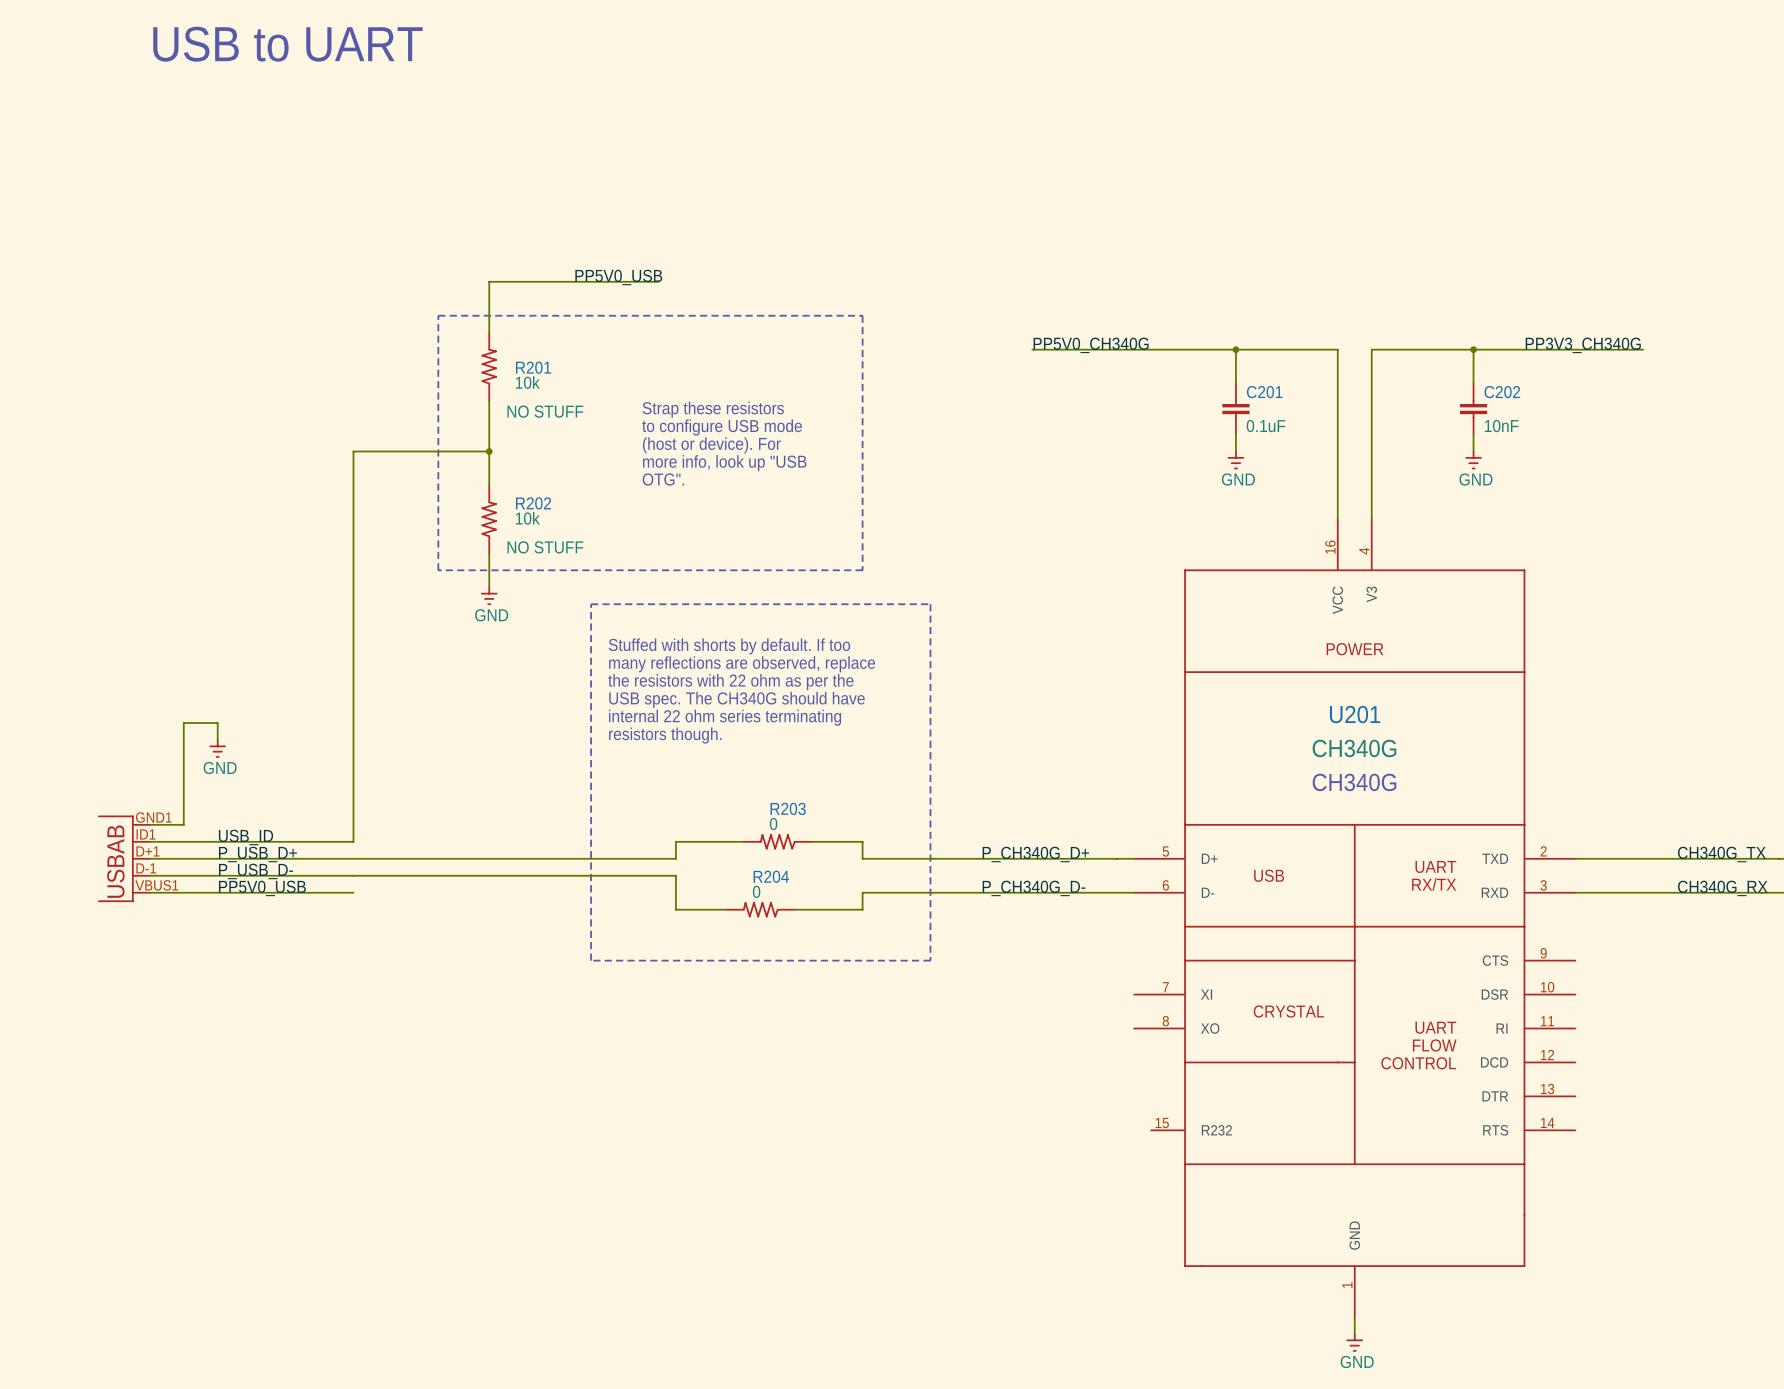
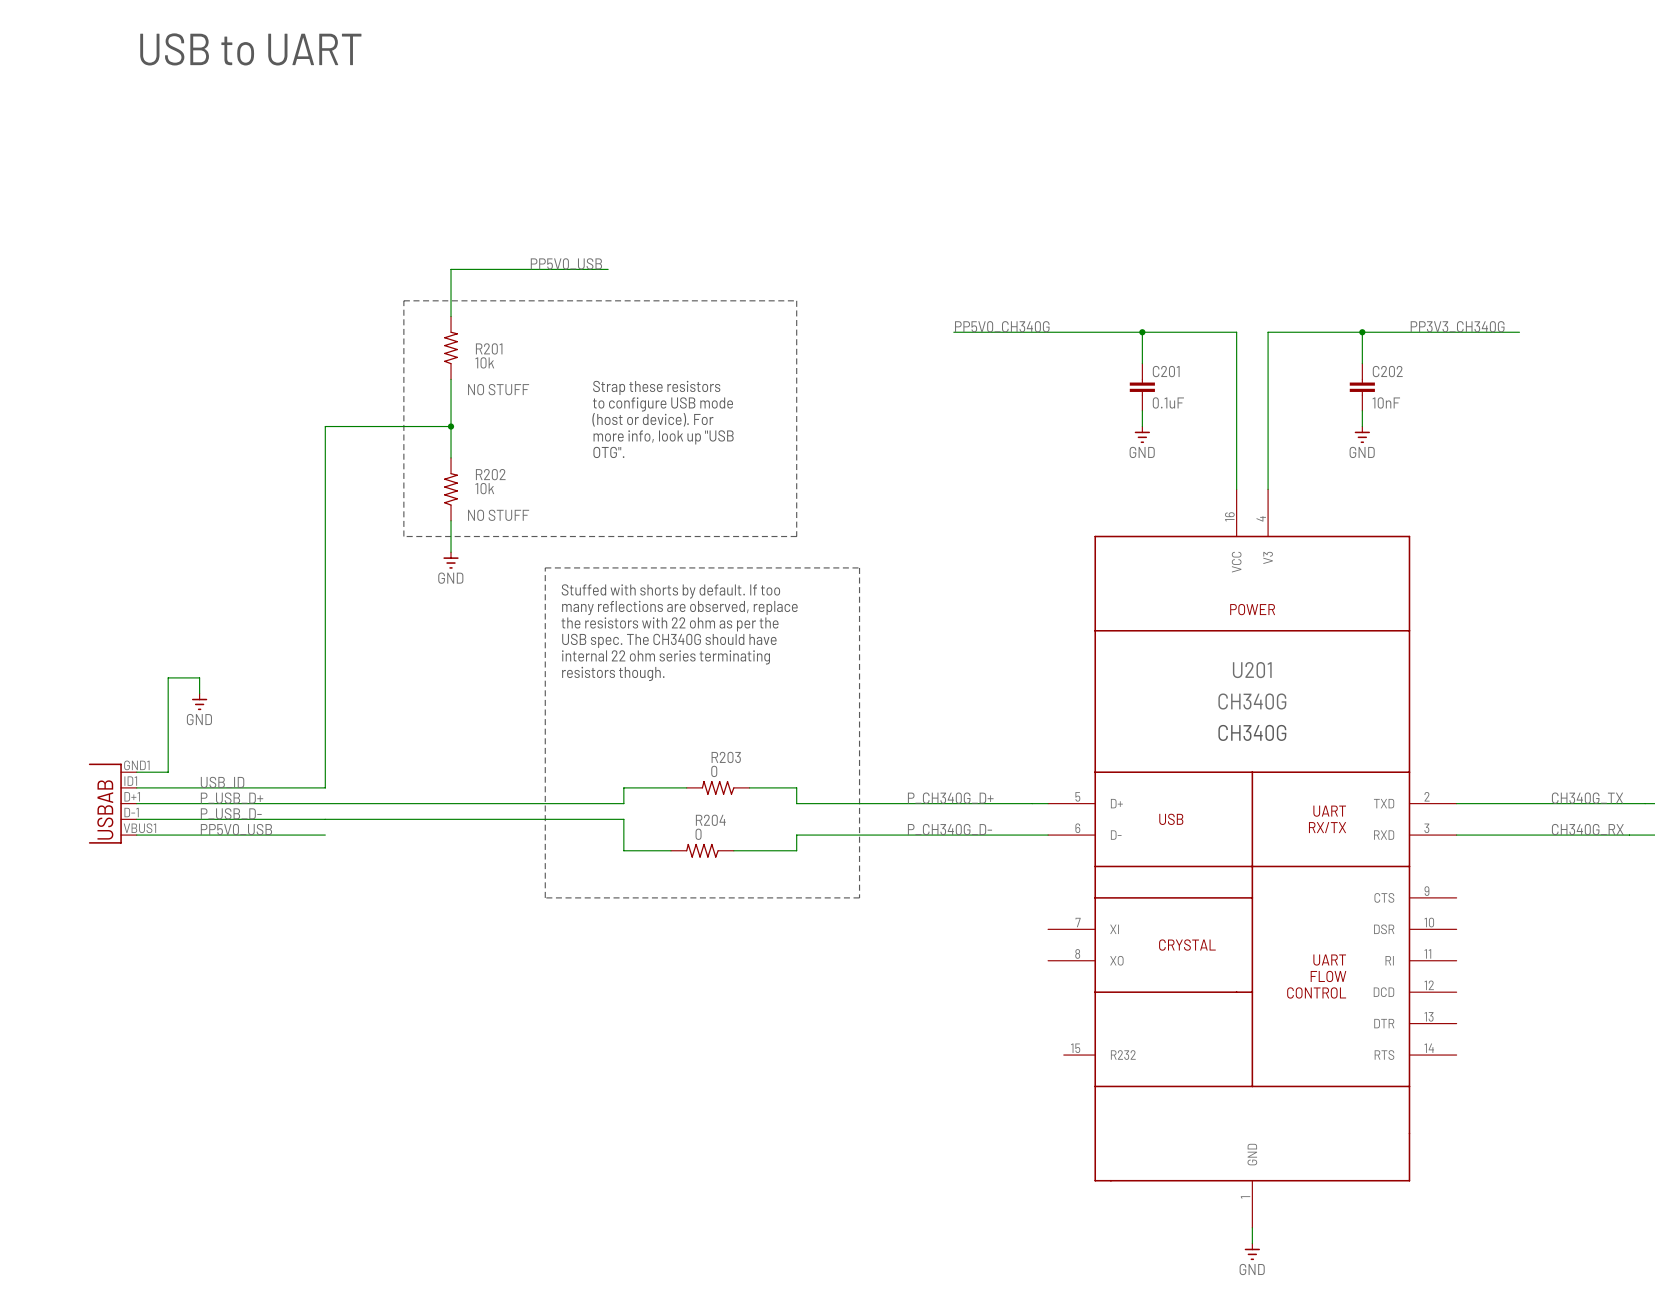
text: none -> Stuffed with shorts by default. If too (670, 591)
text: Stuffed with shorts by default. If too (729, 646) -> many reflections are observed, replace (679, 607)
text: many reflections are observed, replace (742, 664) -> the resistors with 22 ohm as per the (670, 624)
text: the resistors with 22 ohm as per the (730, 682) -> USB spec. The CH340G should have (669, 640)
text: USB spec. The CH340G should have (737, 699) -> internal 22 ohm series terminating (666, 657)
text: internal 22 ohm series terminating (725, 717) -> resistors though. (613, 673)
text: resistors though. (665, 735) -> none

